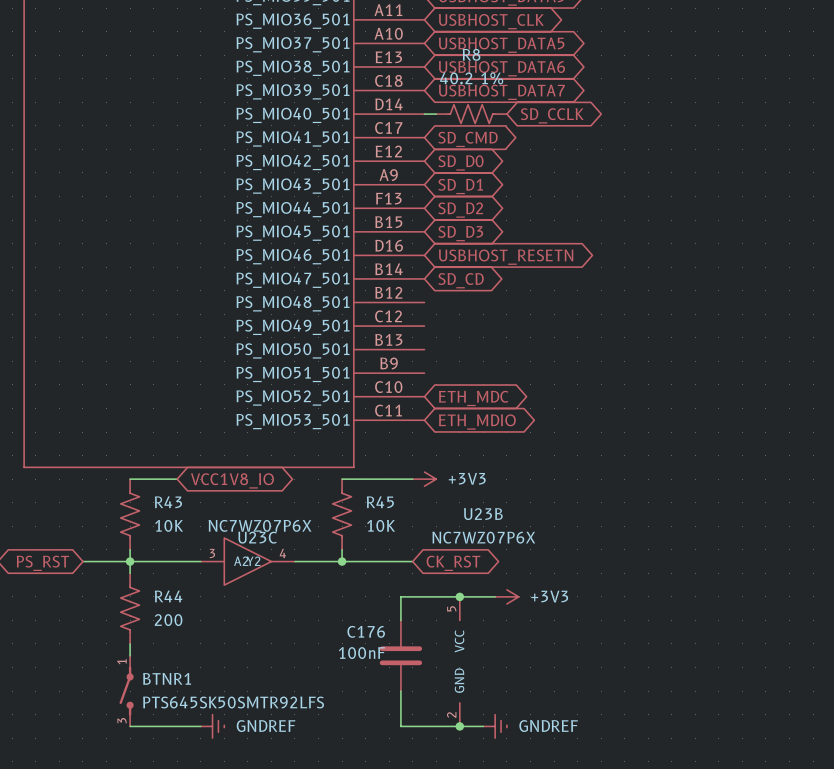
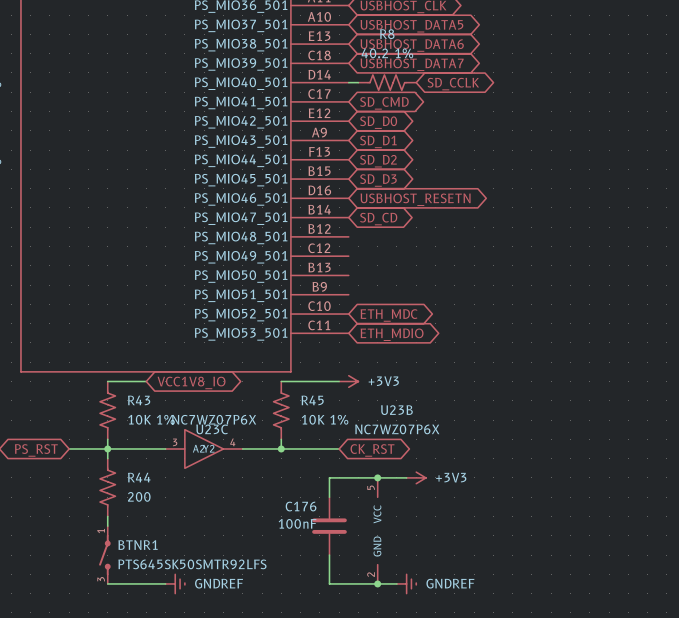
R43 value: 10K (169, 525) -> 10K 1% (151, 419)
R45 value: 10K (381, 525) -> 10K 1% (325, 419)

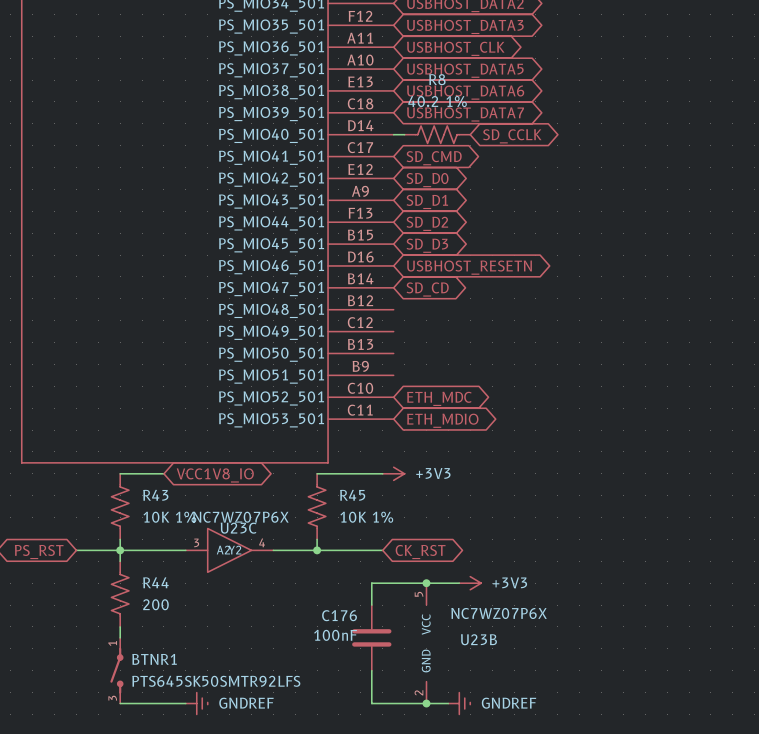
U23B name position: U23B (396, 410) -> U23B (478, 639)
U23B value position: NC7WZ07P6X (397, 429) -> NC7WZ07P6X (499, 613)

